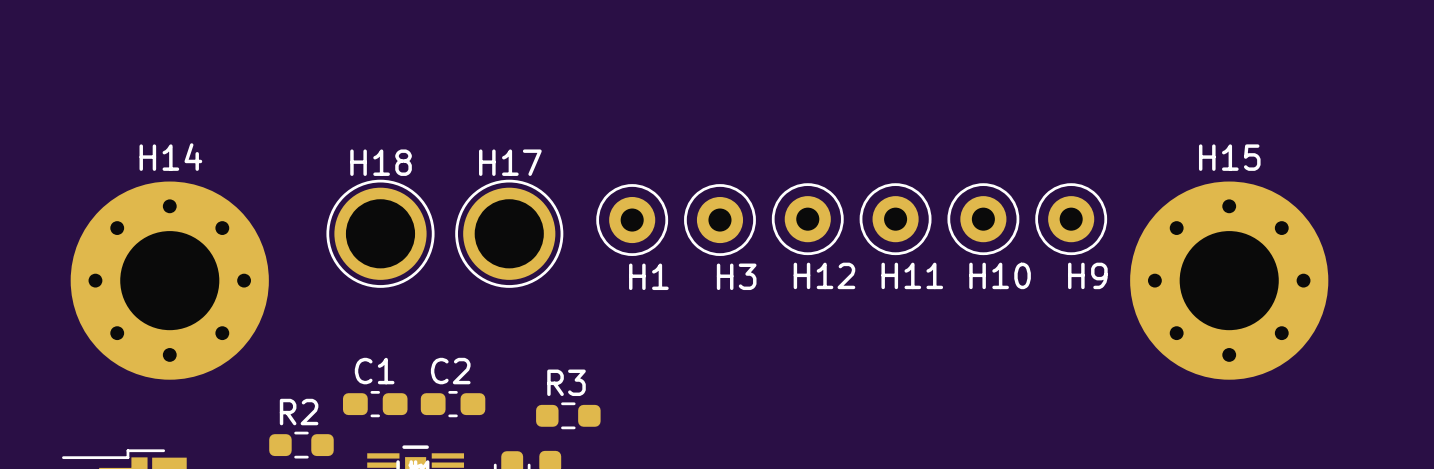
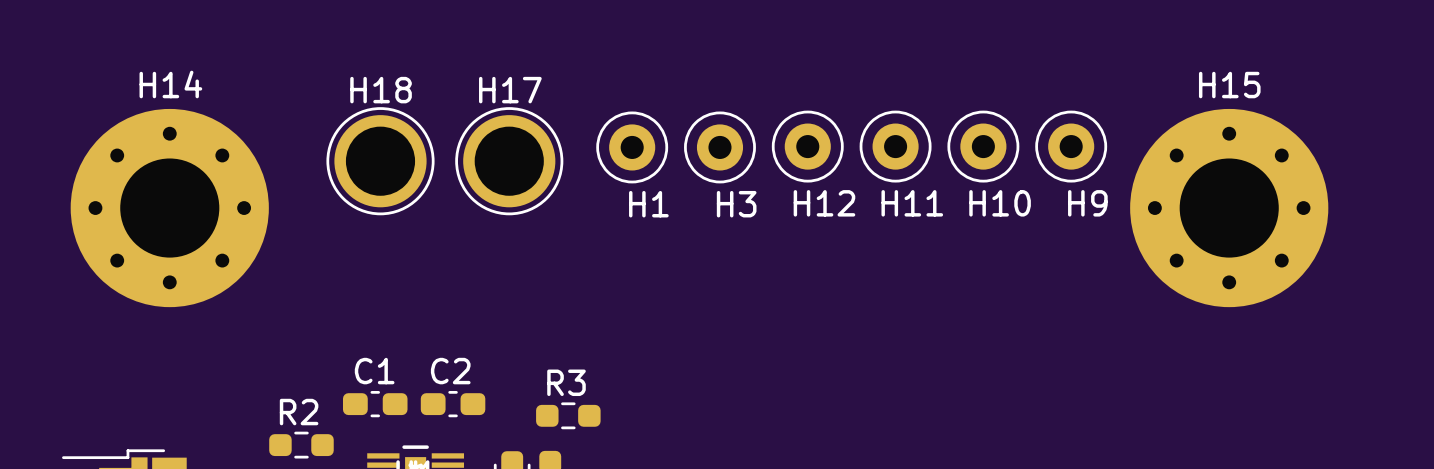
H12 position: (807, 219) -> (807, 146)
H11 position: (895, 219) -> (895, 146)
H10 position: (983, 219) -> (983, 146)
H9 position: (1071, 219) -> (1071, 146)
H1 position: (632, 220) -> (632, 147)
H3 position: (719, 220) -> (719, 147)
H18 position: (380, 233) -> (380, 161)
H17 position: (509, 233) -> (509, 161)
H14 position: (169, 280) -> (169, 208)
H15 position: (1229, 280) -> (1229, 208)

